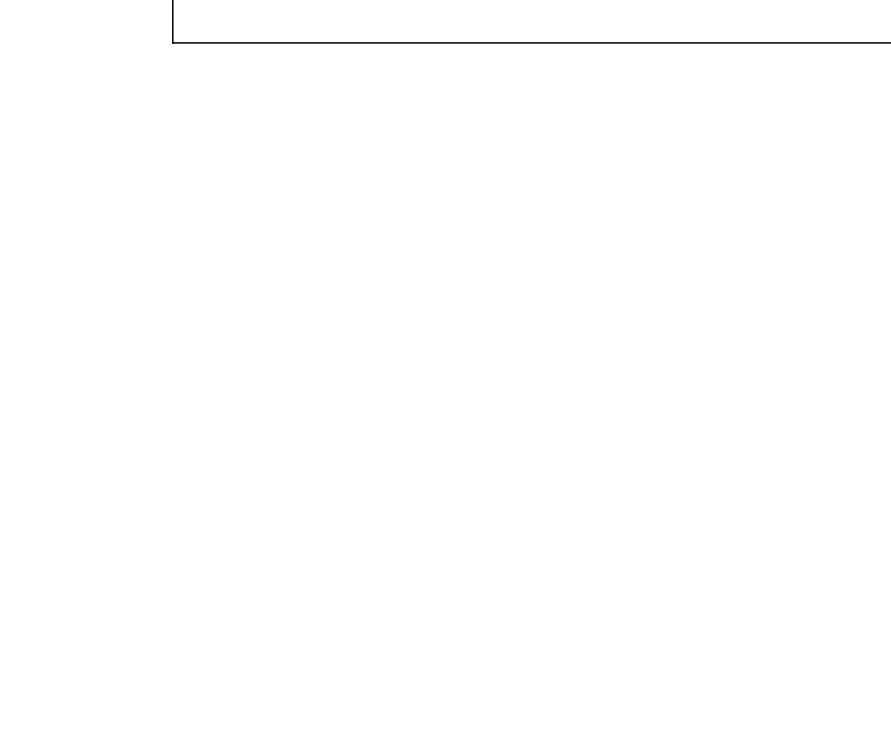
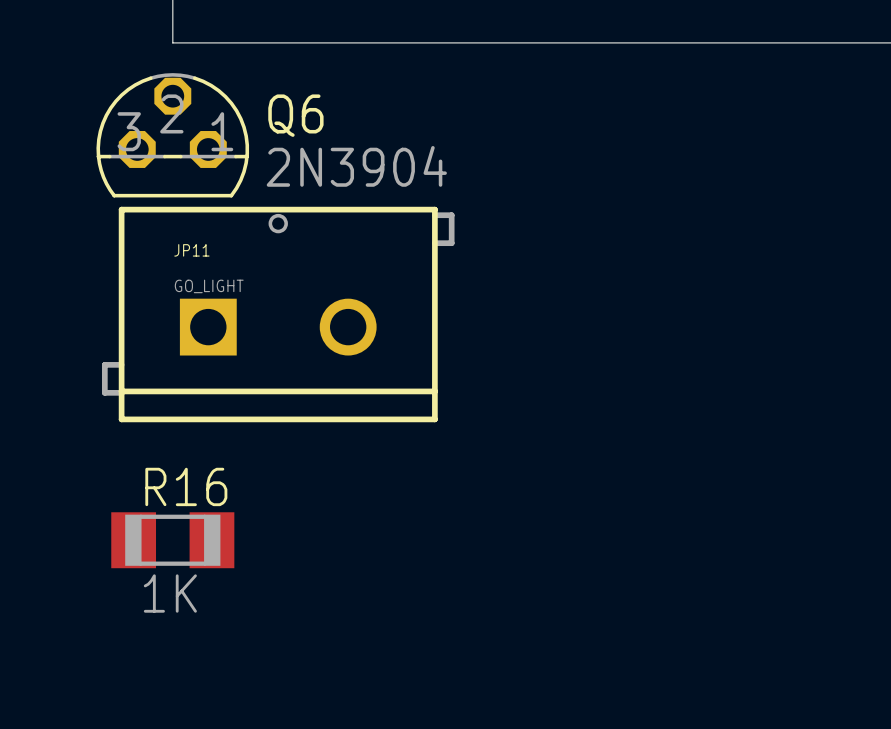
Q6: none -> 2N3904 (172, 135)
JP11: none -> GO_LIGHT (278, 314)
R16: none -> 1K (172, 540)

